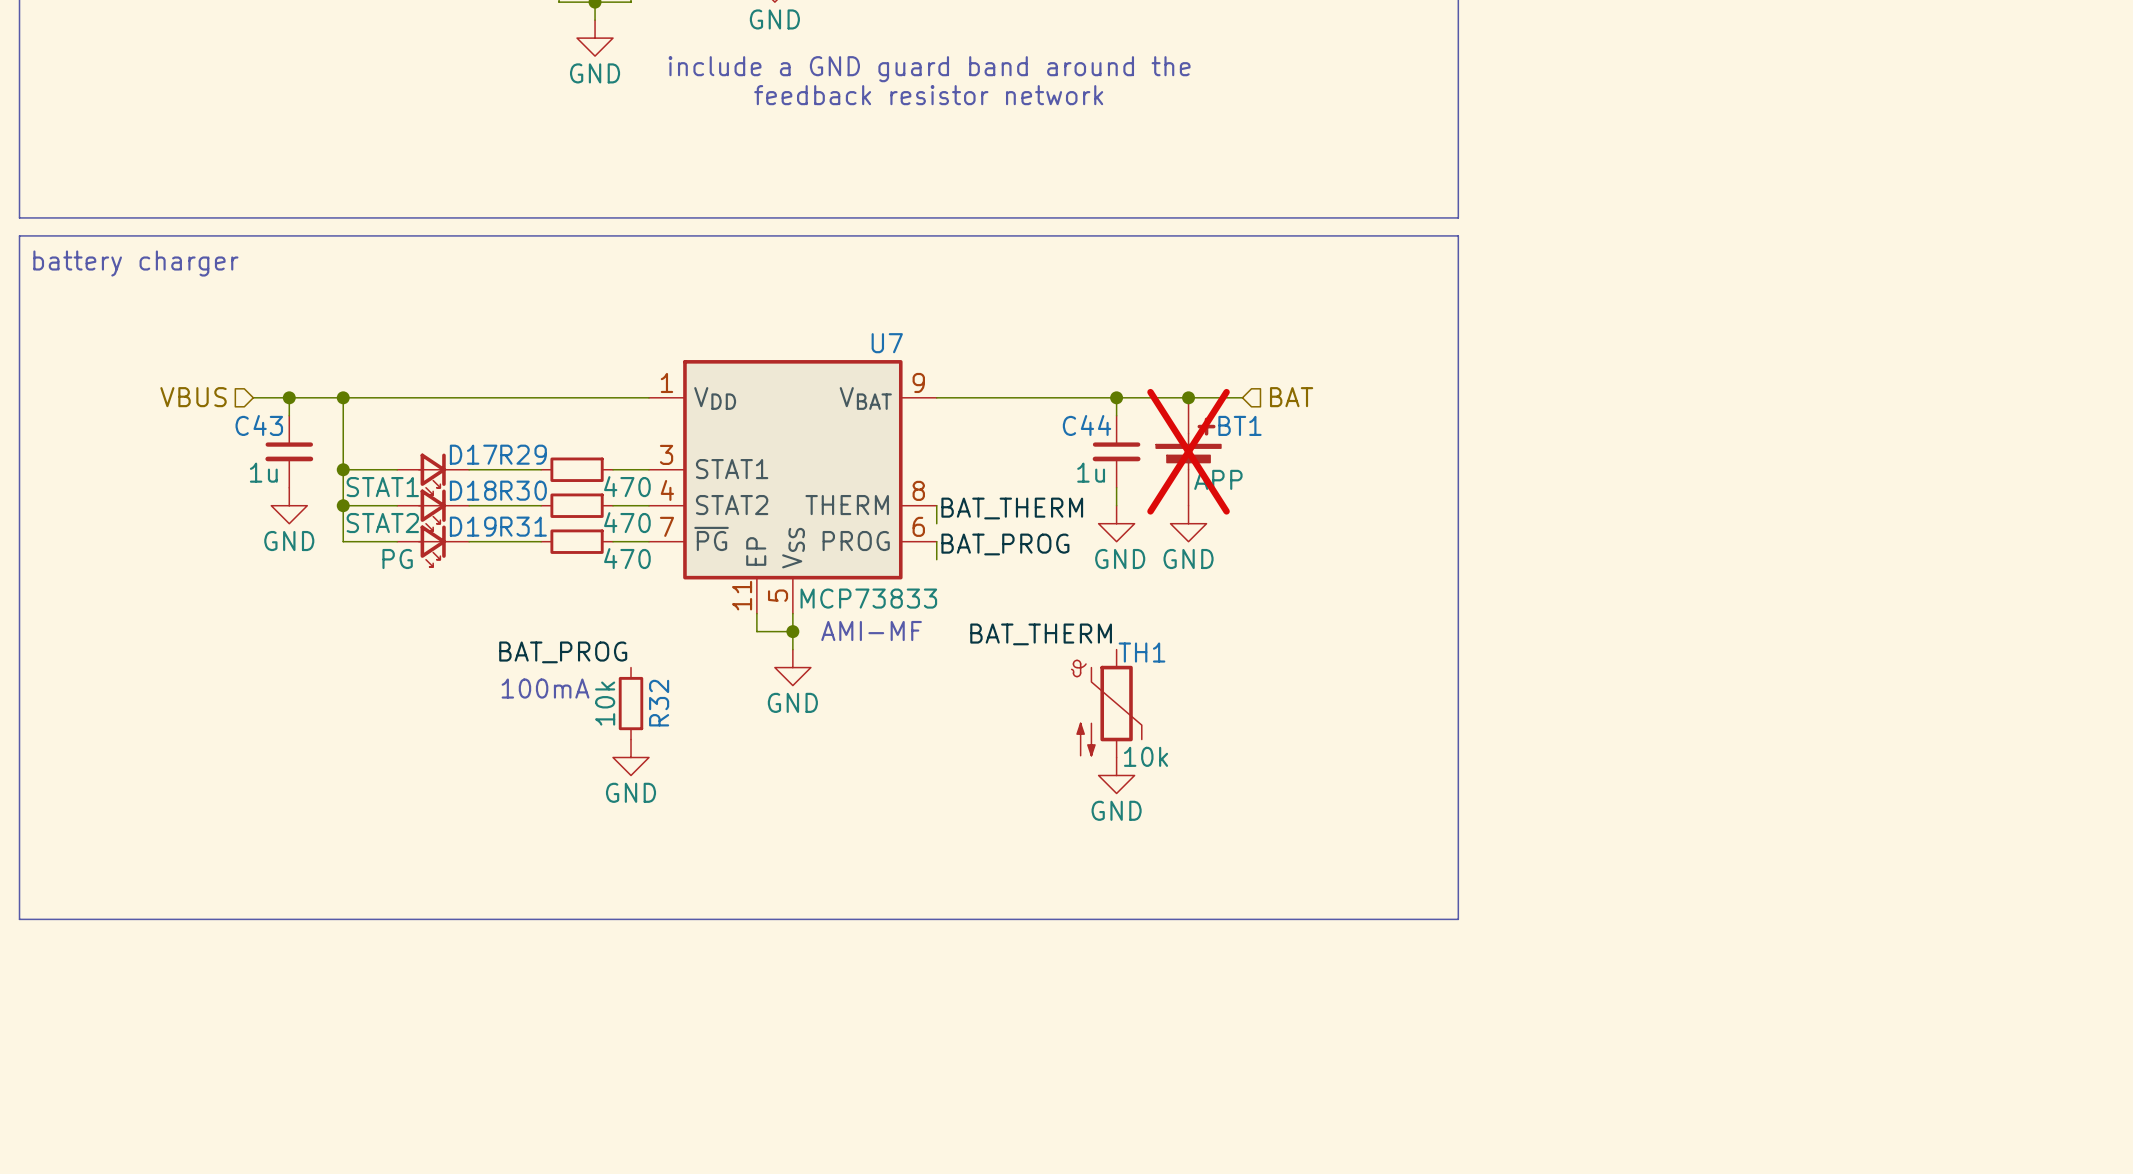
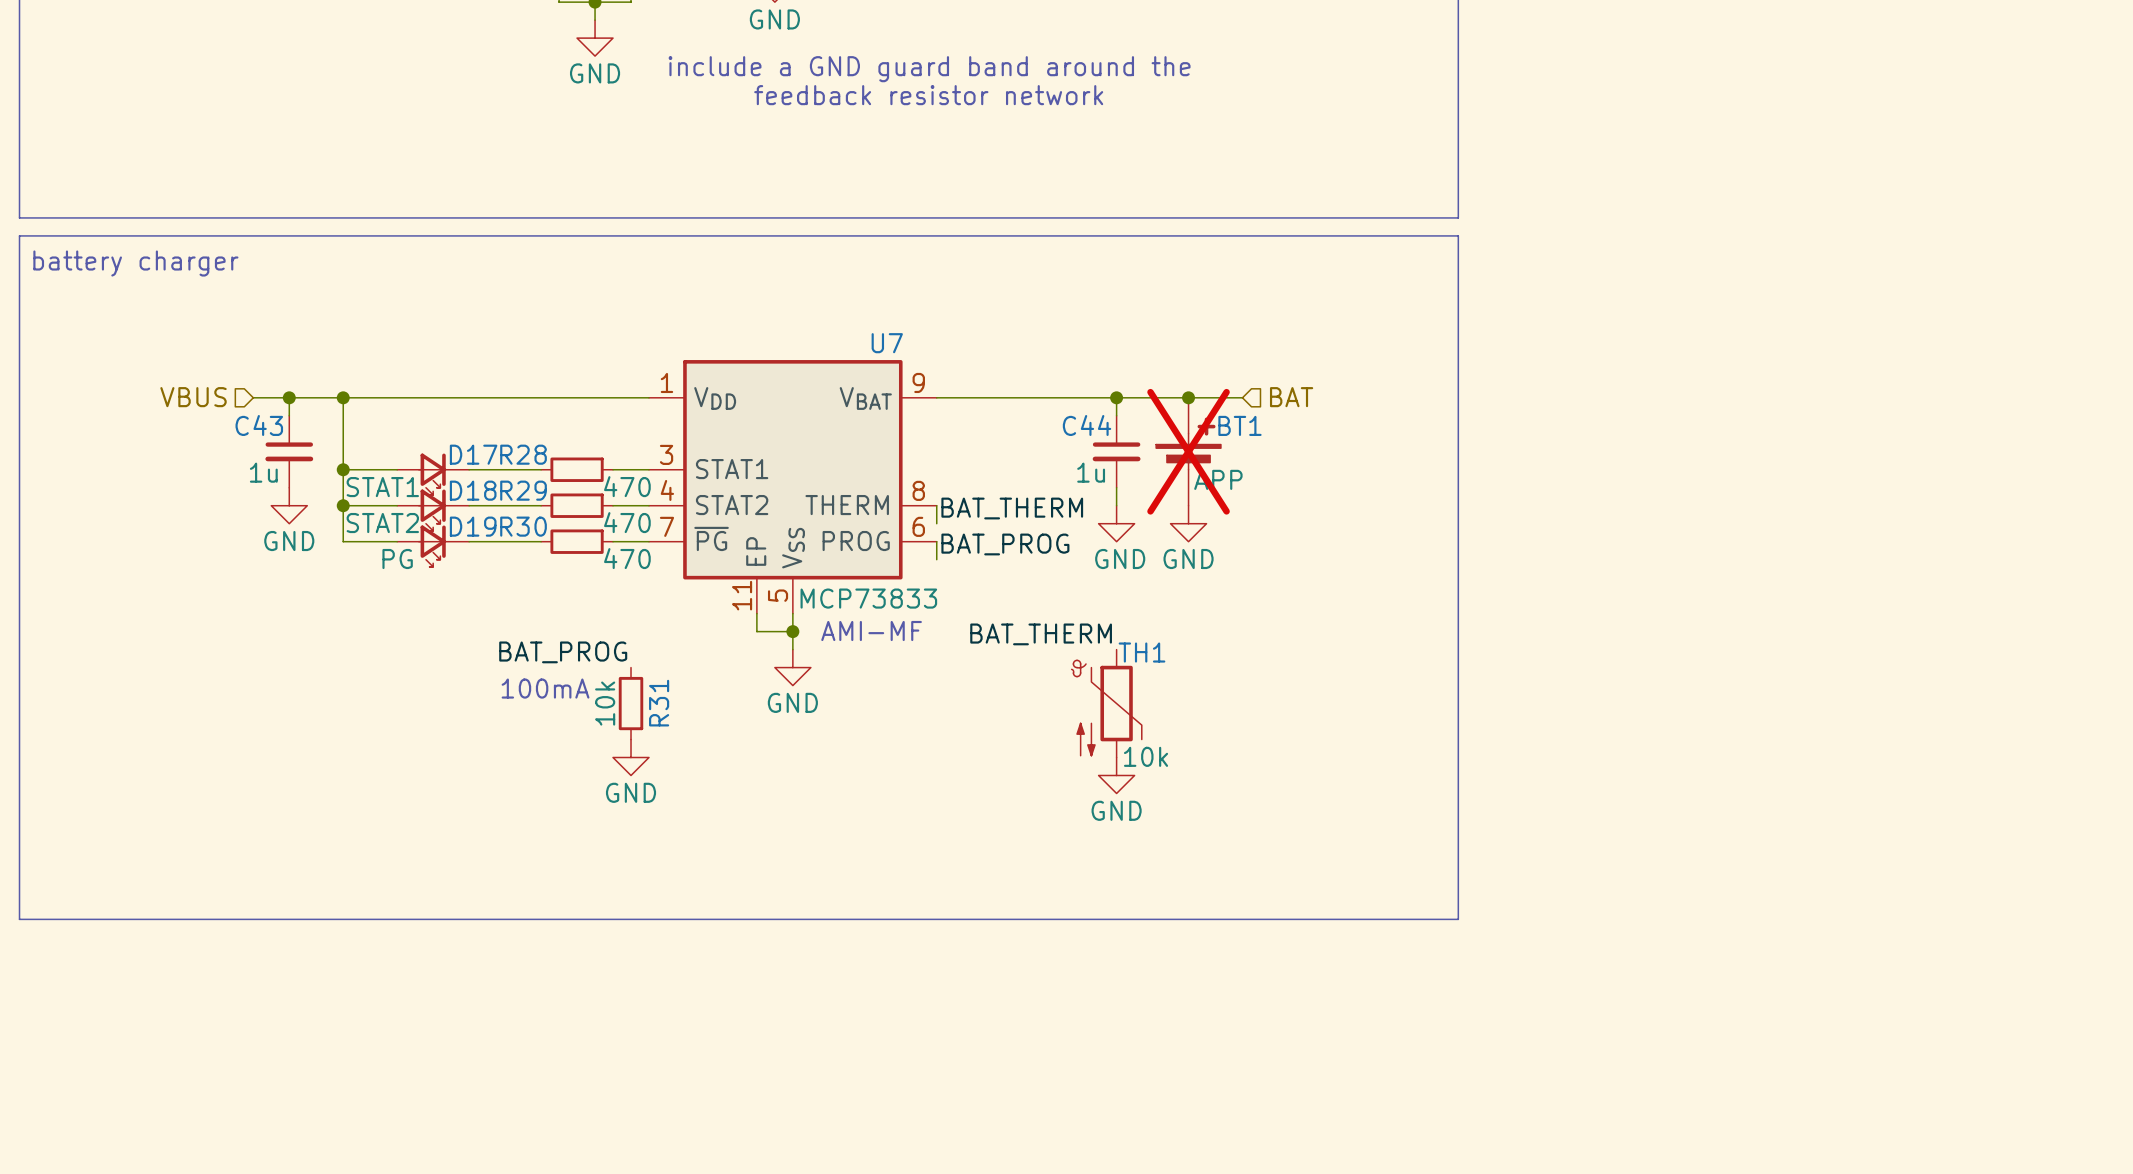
R29 name: R29 (523, 454) -> R28 (523, 454)
R30 name: R30 (523, 490) -> R29 (523, 490)
R31 name: R31 (523, 526) -> R30 (523, 526)
R32 name: R32 (659, 703) -> R31 (659, 703)

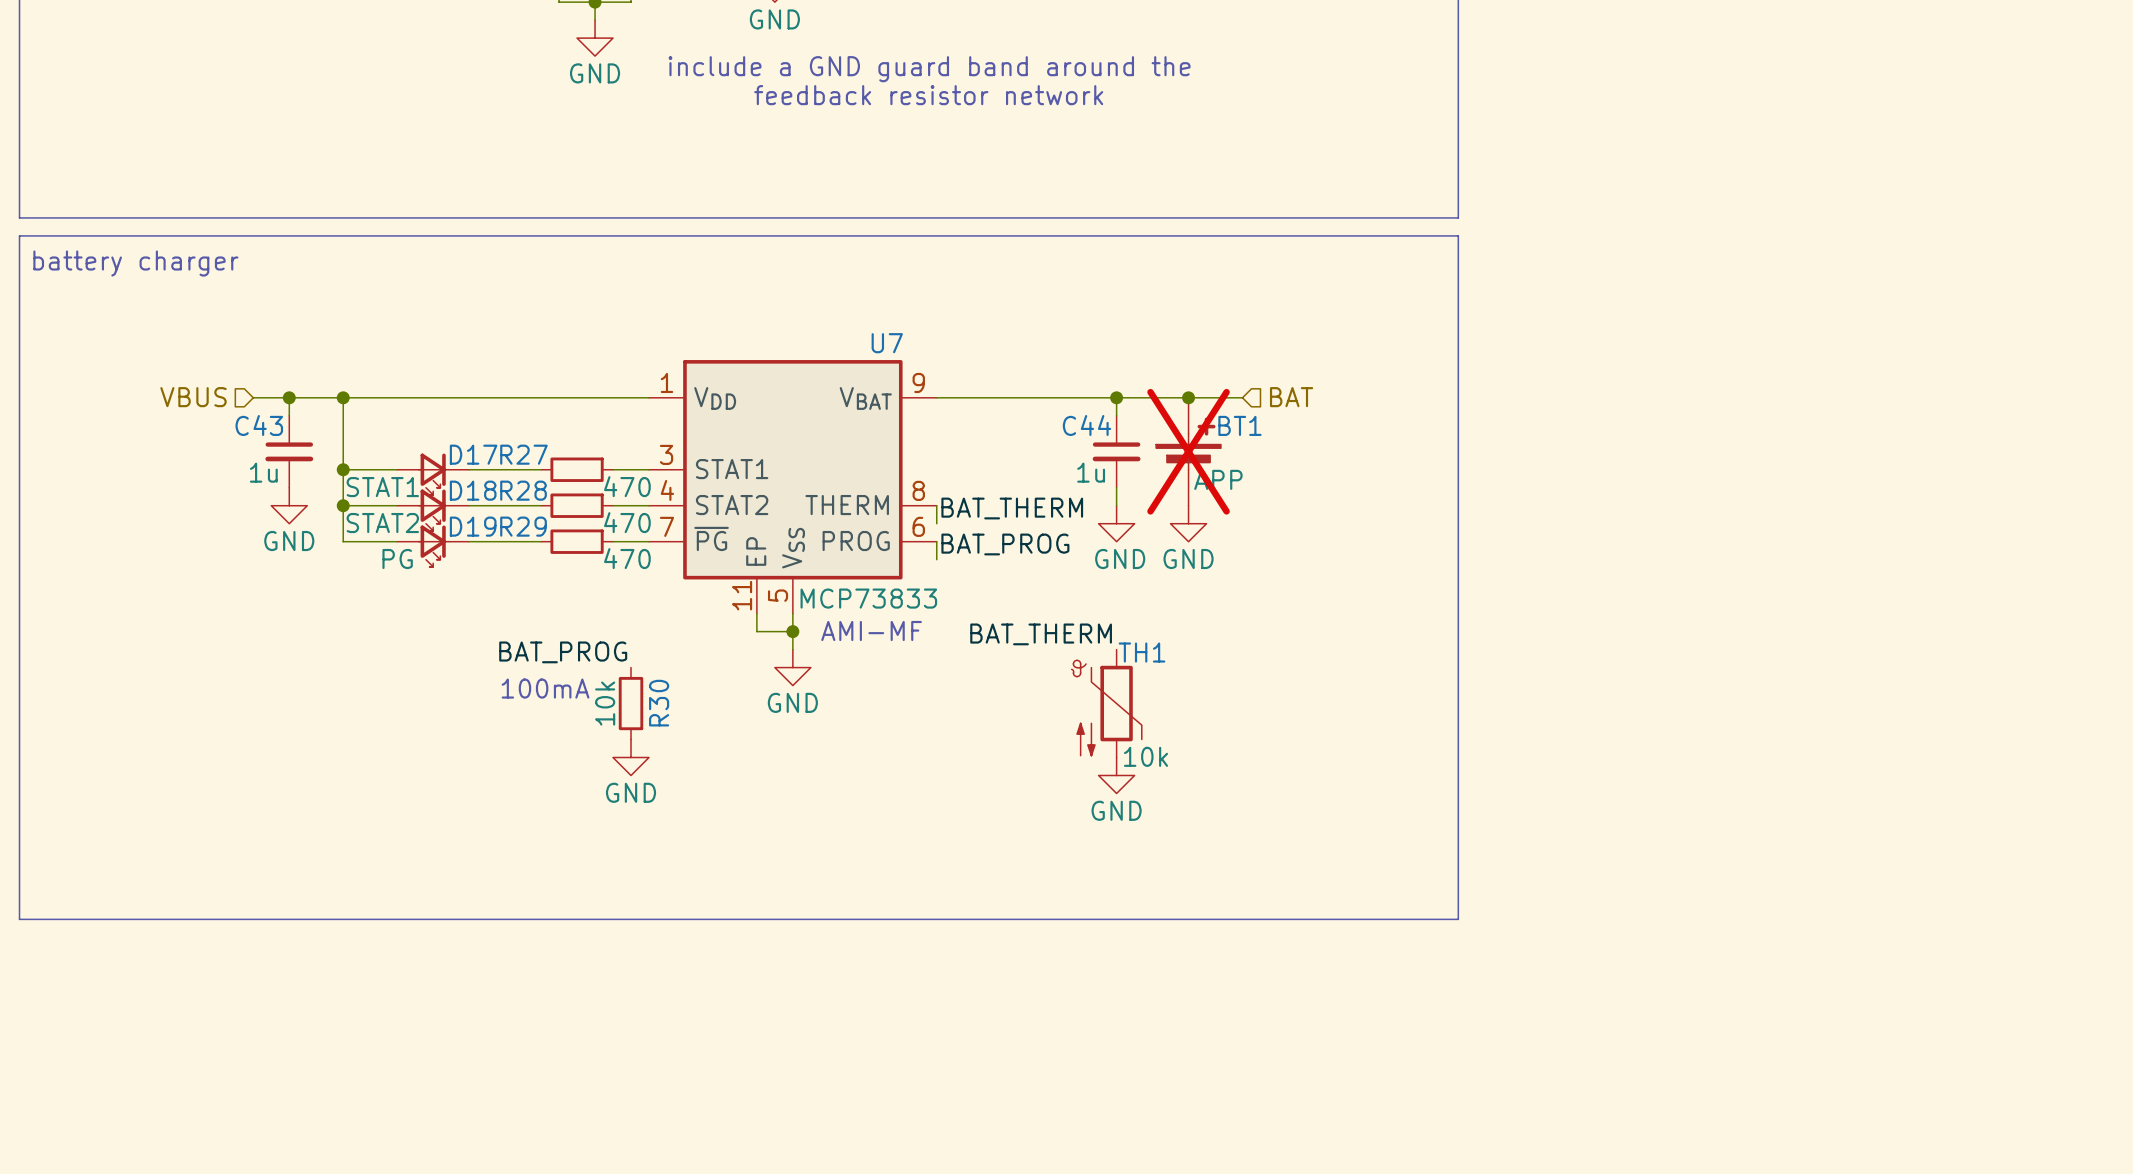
R28 name: R28 (523, 454) -> R27 (523, 454)
R29 name: R29 (523, 490) -> R28 (523, 490)
R30 name: R30 (523, 526) -> R29 (523, 526)
R31 name: R31 (659, 703) -> R30 (659, 703)

